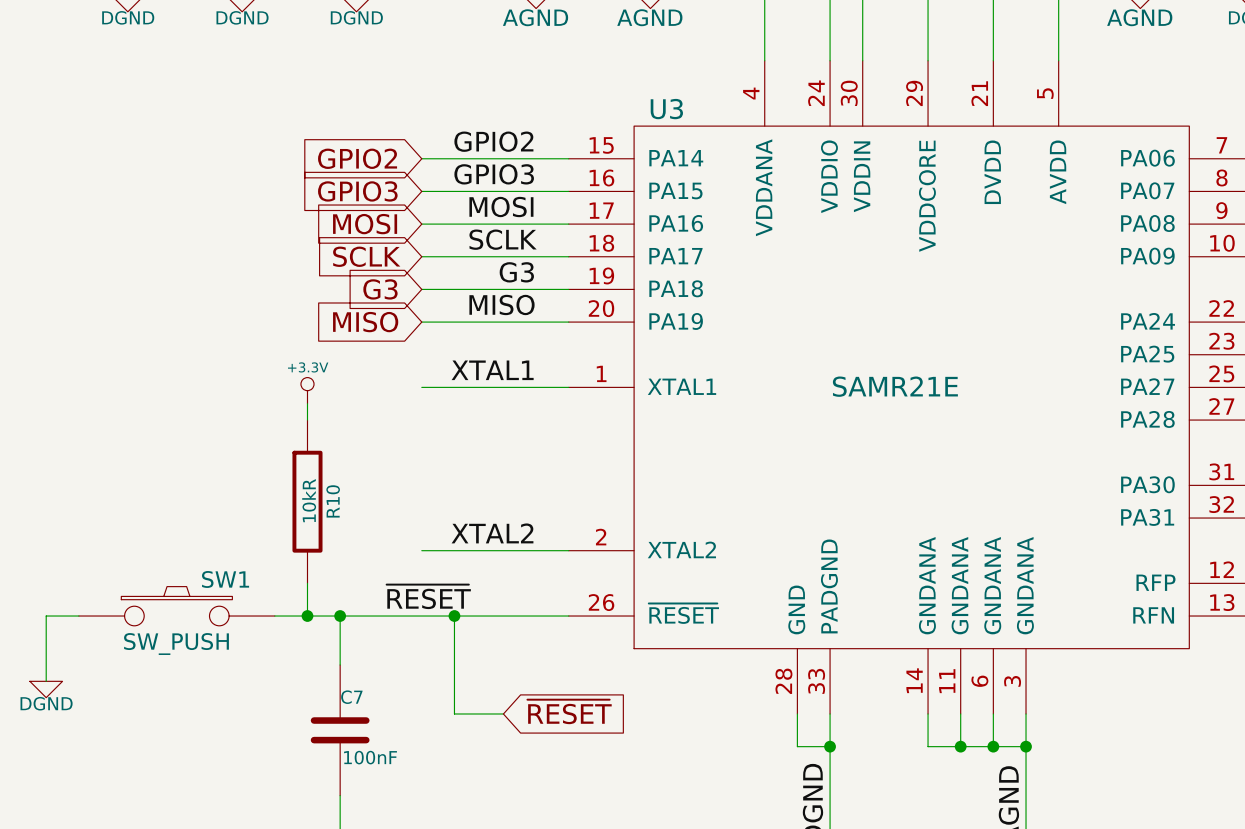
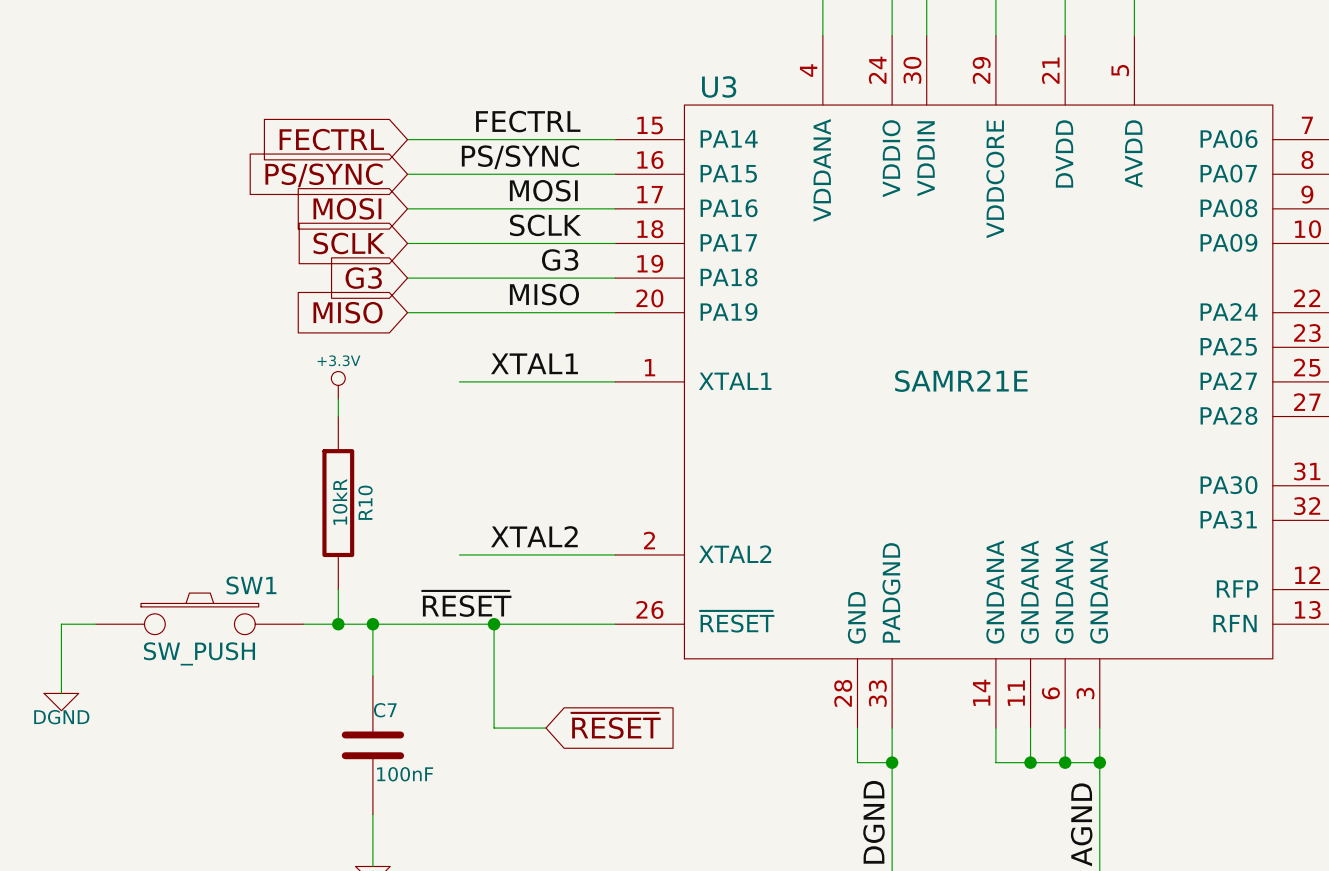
label: GPIO2 (493, 141) -> FECTRL (528, 121)
global label: none -> FECTRL (331, 139)
global label: GPIO2 (357, 158) -> none
wire: none -> (407, 139) (459, 139)
label: GPIO3 (494, 174) -> PS/SYNC (520, 157)
global label: GPIO3 (357, 191) -> none
wire: none -> (407, 174) (459, 174)
global label: none -> PS/SYNC (324, 175)
global label position: MOSI (365, 224) -> MOSI (347, 208)
wire: none -> (407, 208) (459, 208)
global label position: SCLK (366, 256) -> SCLK (349, 243)
wire: none -> (407, 243) (459, 243)
wire: none -> (407, 278) (459, 278)
global label position: G3 (380, 289) -> G3 (363, 278)
global label position: MISO (365, 322) -> MISO (348, 312)
wire: none -> (407, 312) (459, 312)

